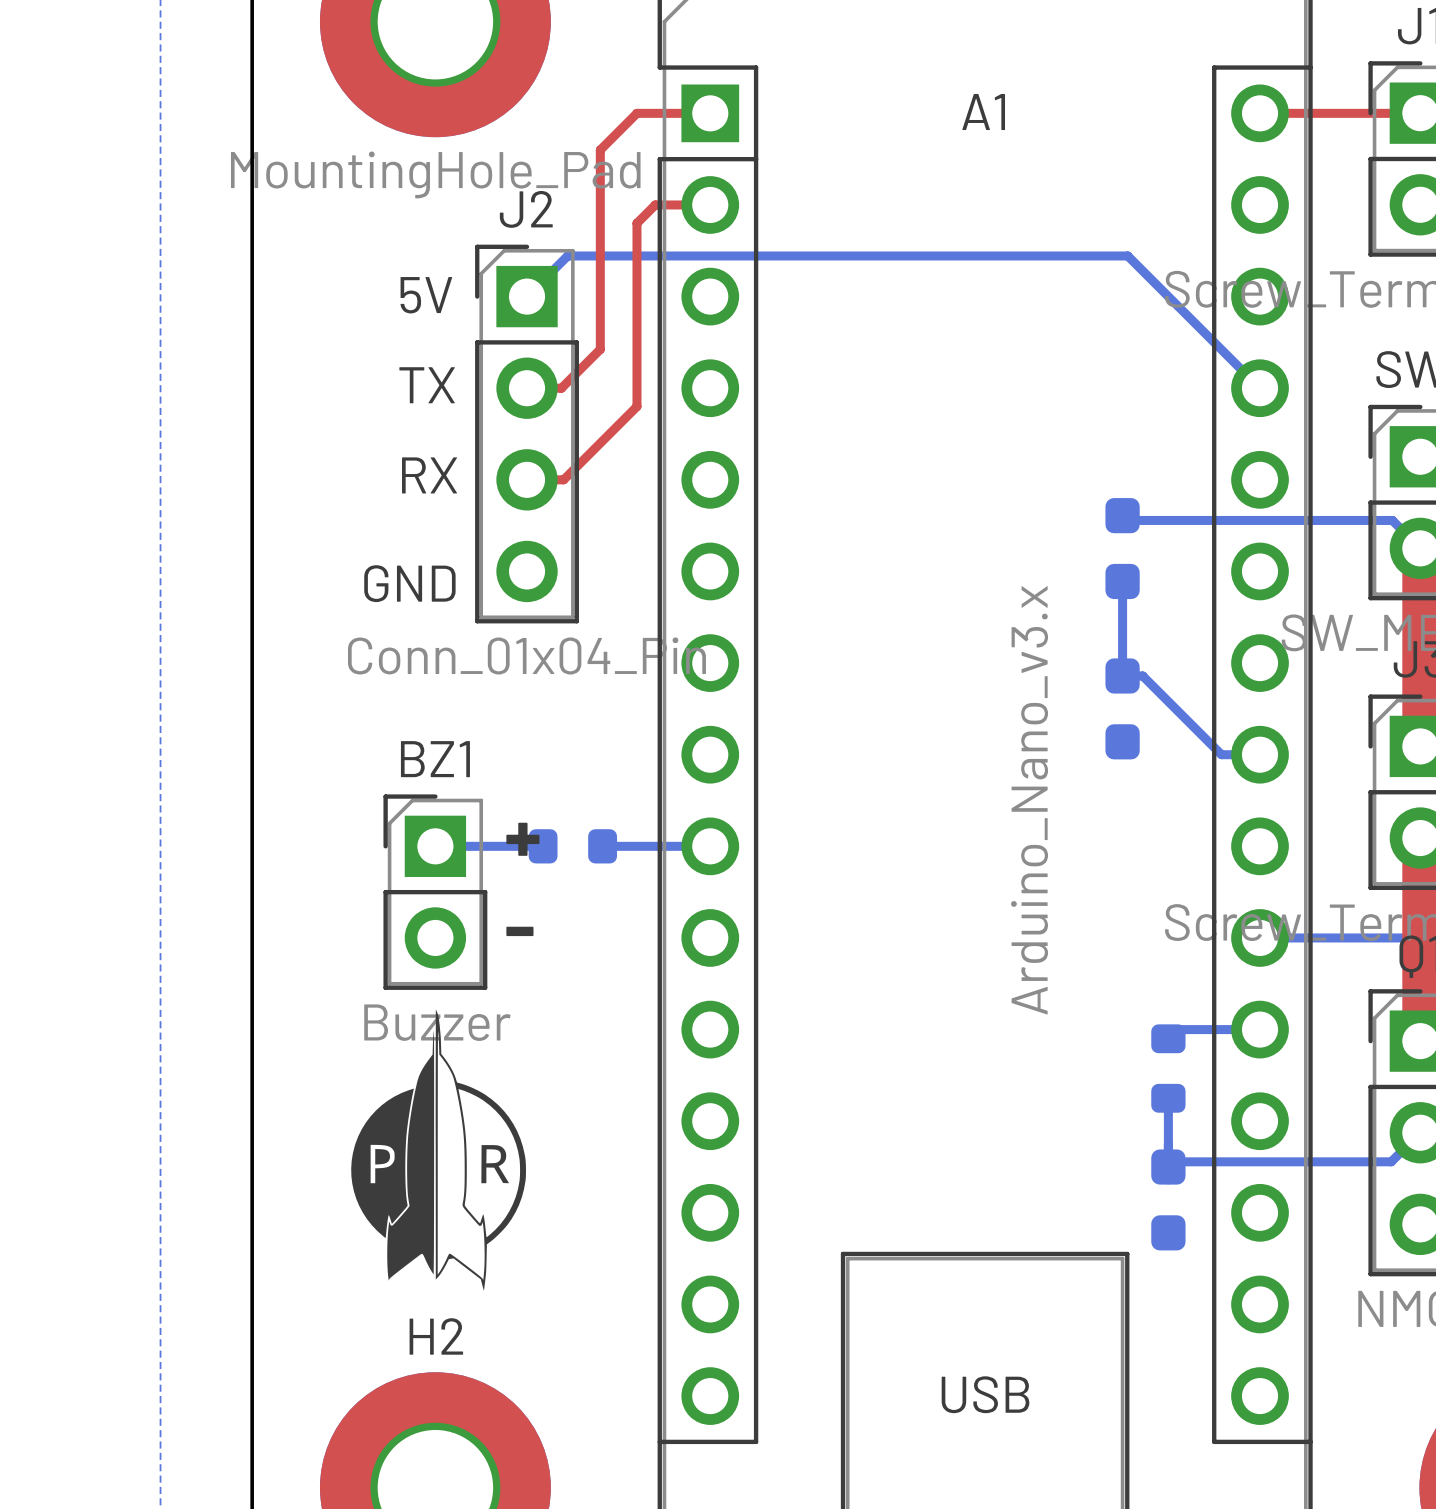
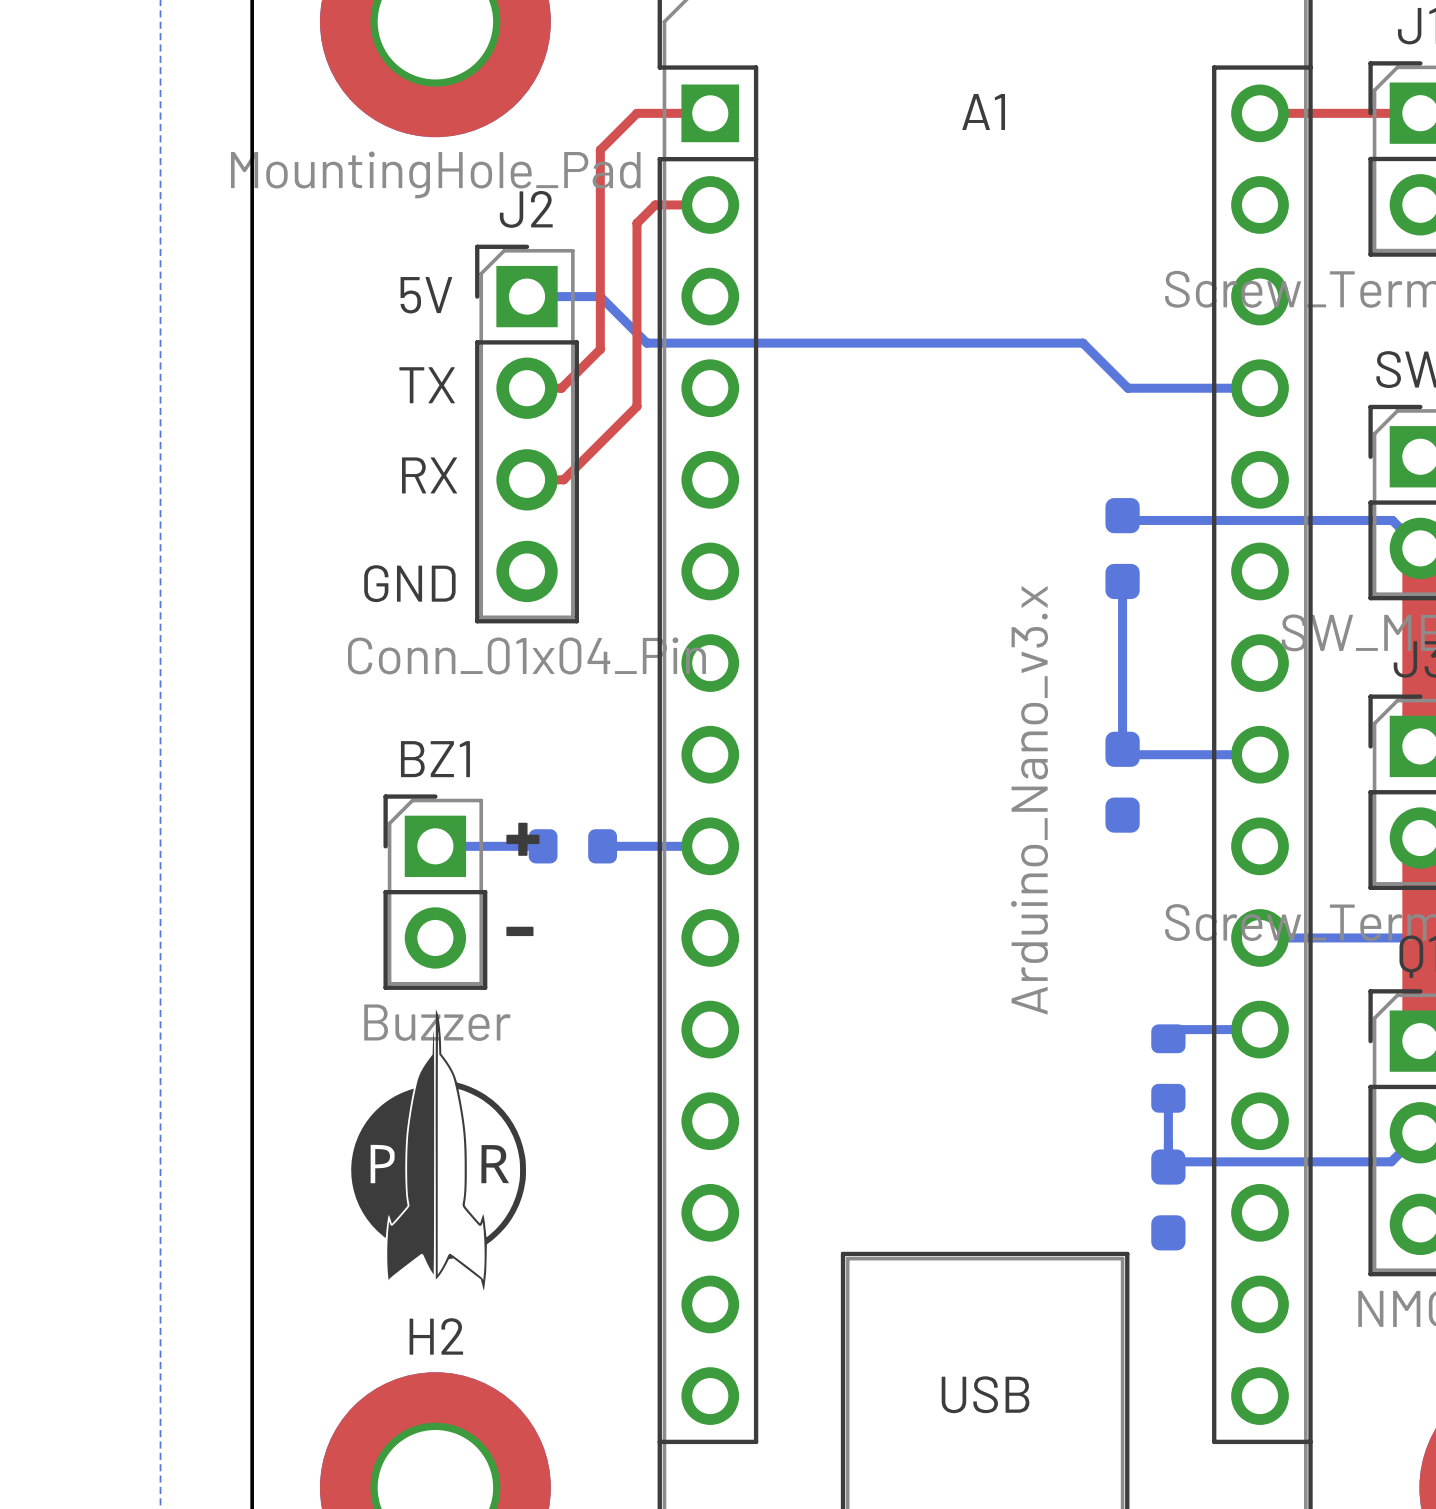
bottom track: (527, 296) (567, 255) (1127, 255) (1260, 388) -> (527, 296) (600, 296) (646, 343) (1082, 343) (1127, 388) (1260, 388)
bottom track: (1122, 675) (1142, 675) (1221, 754) -> (1122, 675) (1122, 749) (1128, 754) (1221, 754)
part position: (1122, 708) -> (1122, 782)

